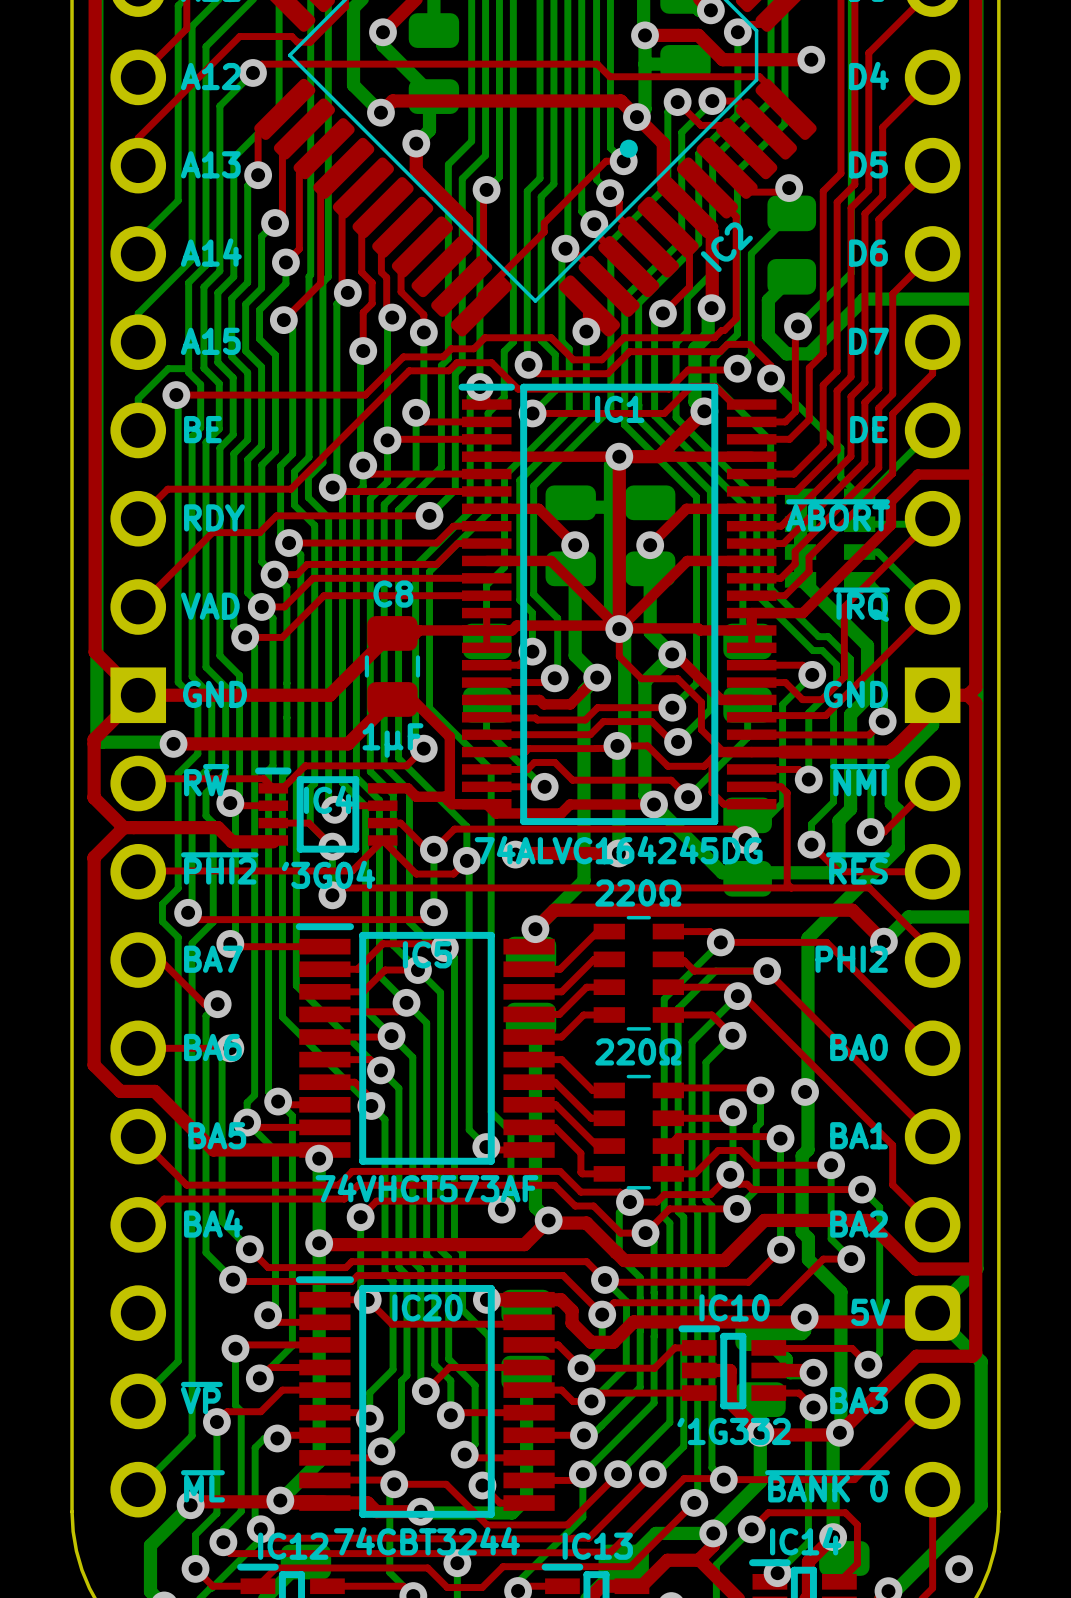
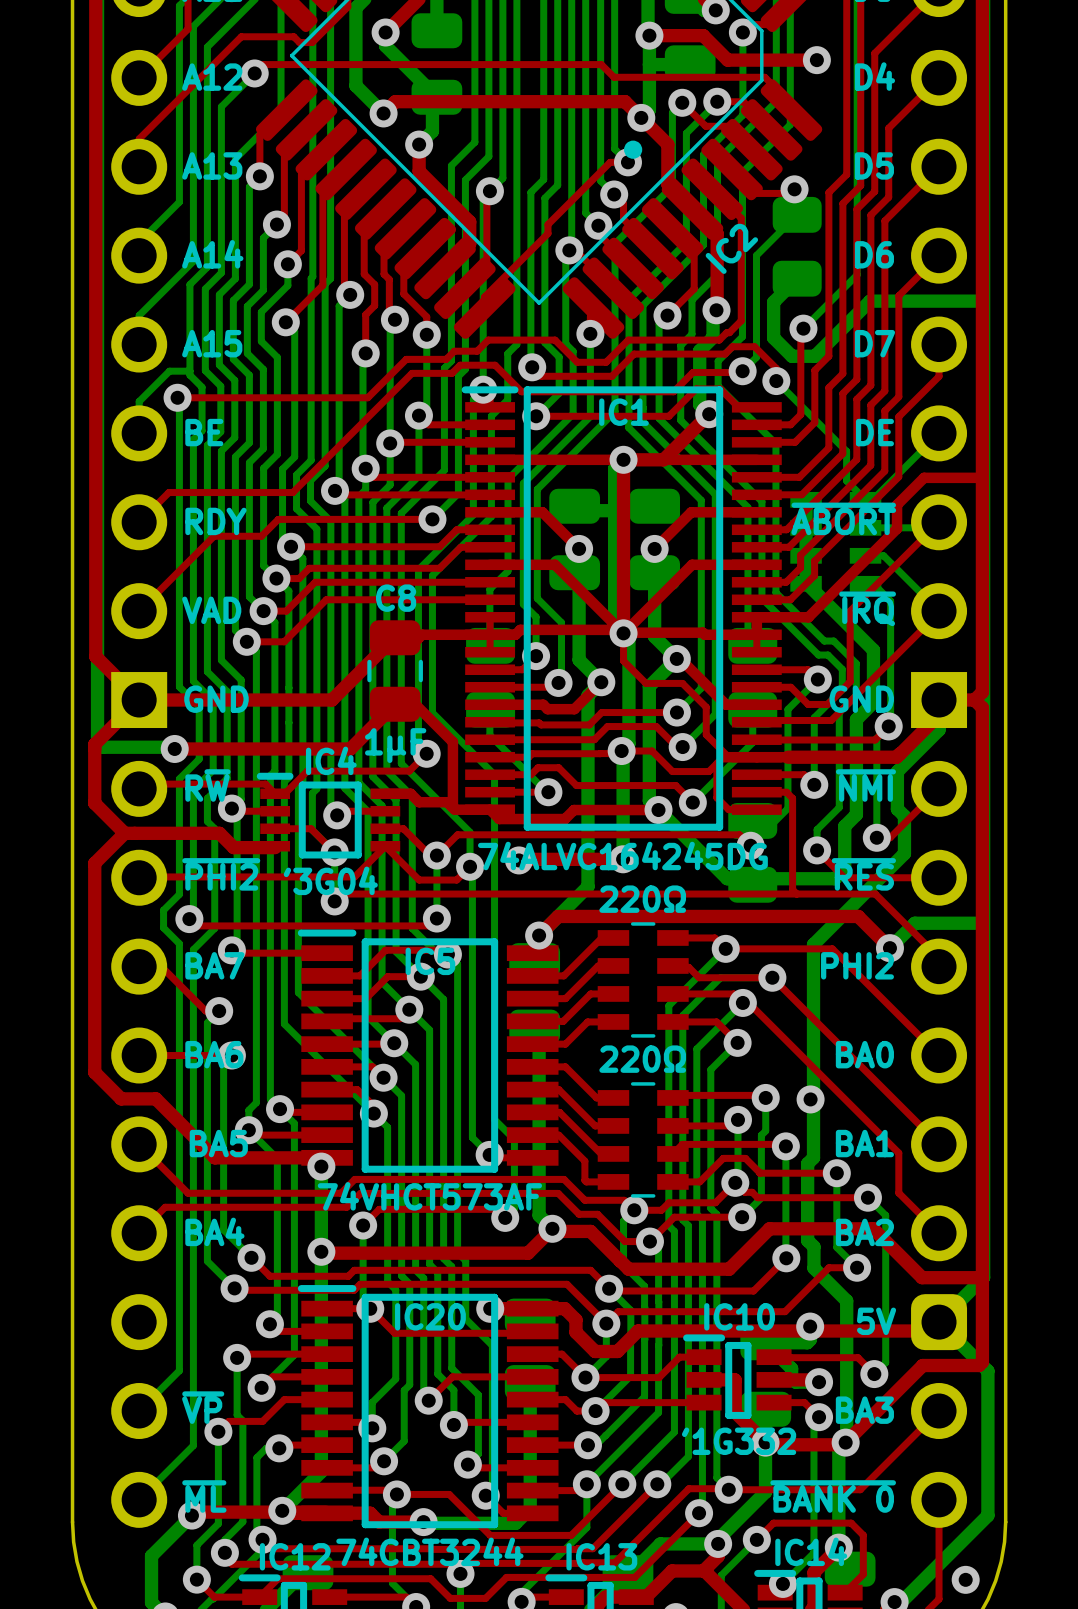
IC4 name position: IC4 (329, 799) -> IC4 (331, 760)

